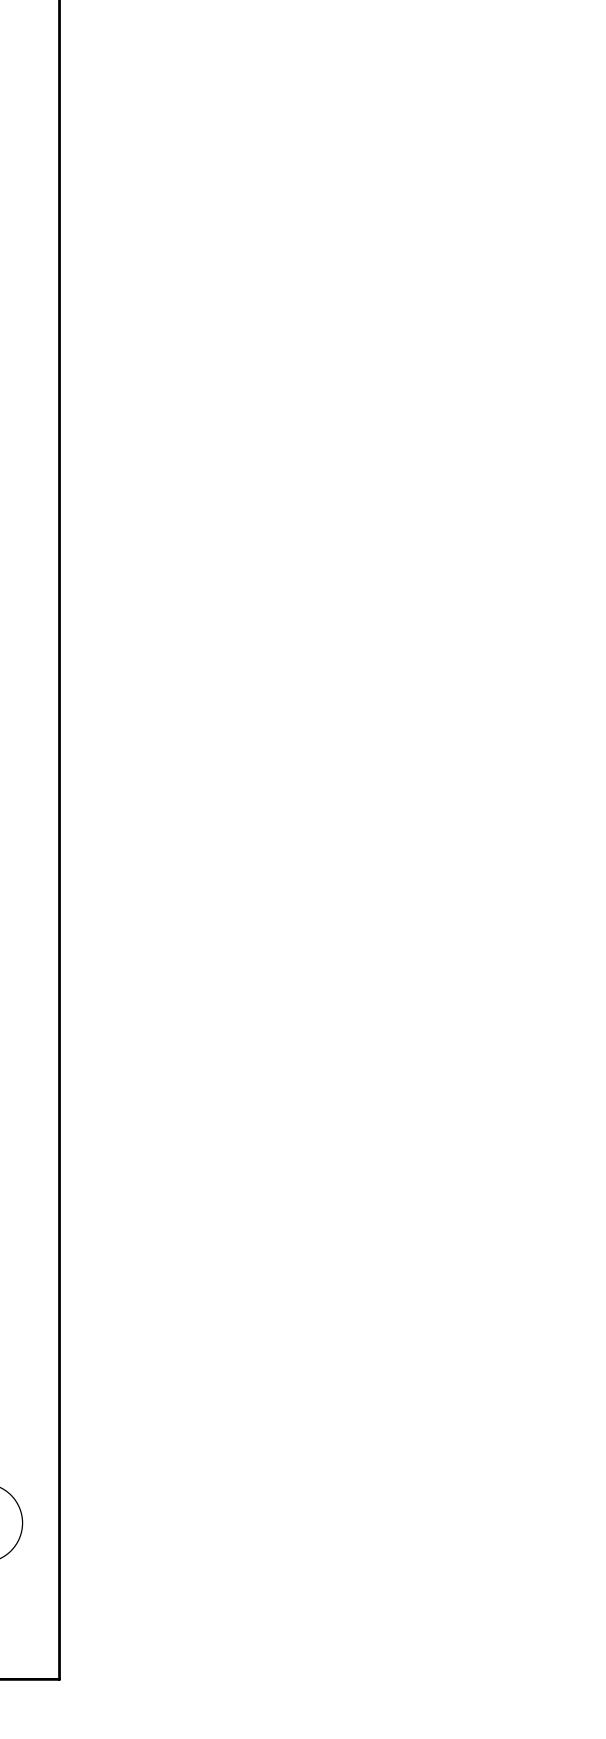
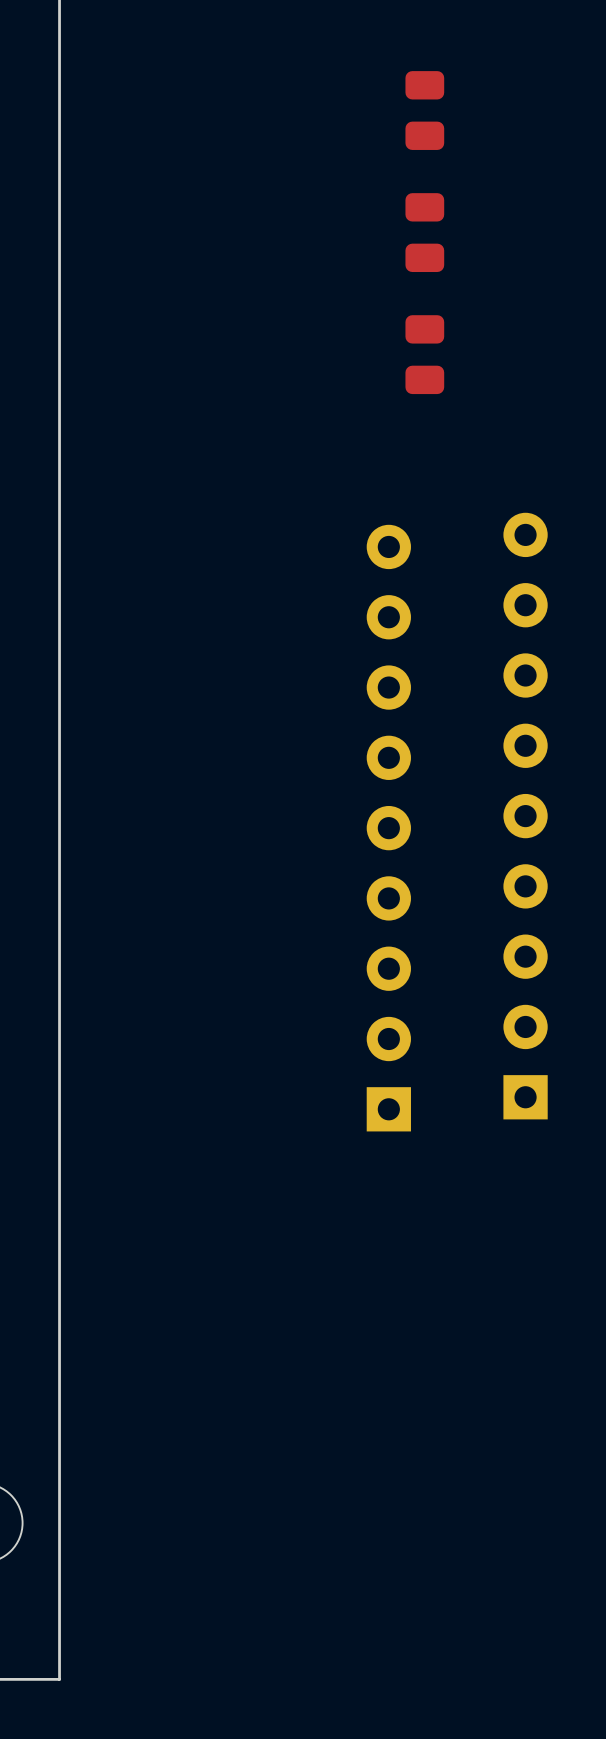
part: none -> (424, 110)
part: none -> (424, 232)
part: none -> (424, 354)
part: none -> (525, 816)
part: none -> (388, 828)

